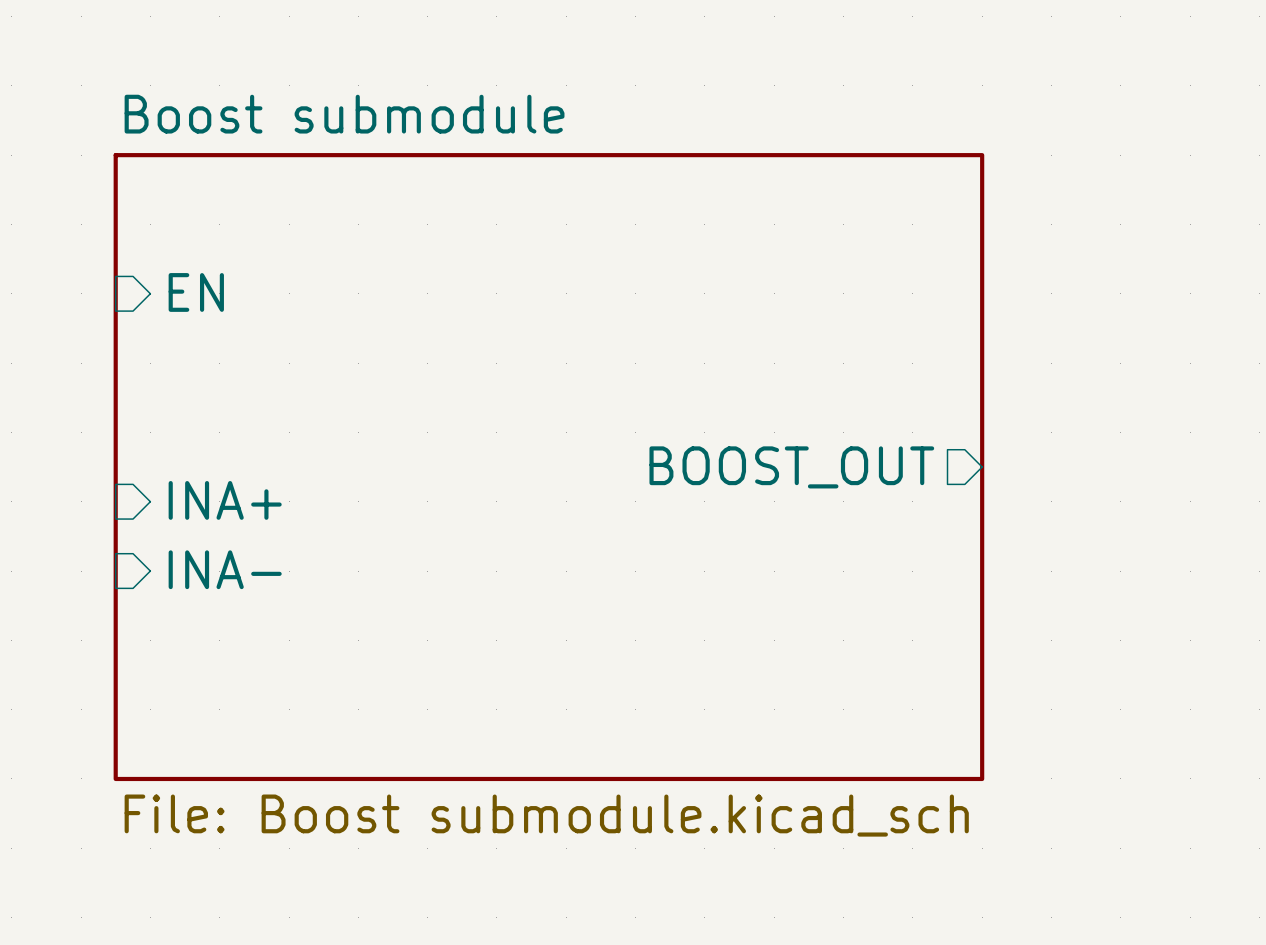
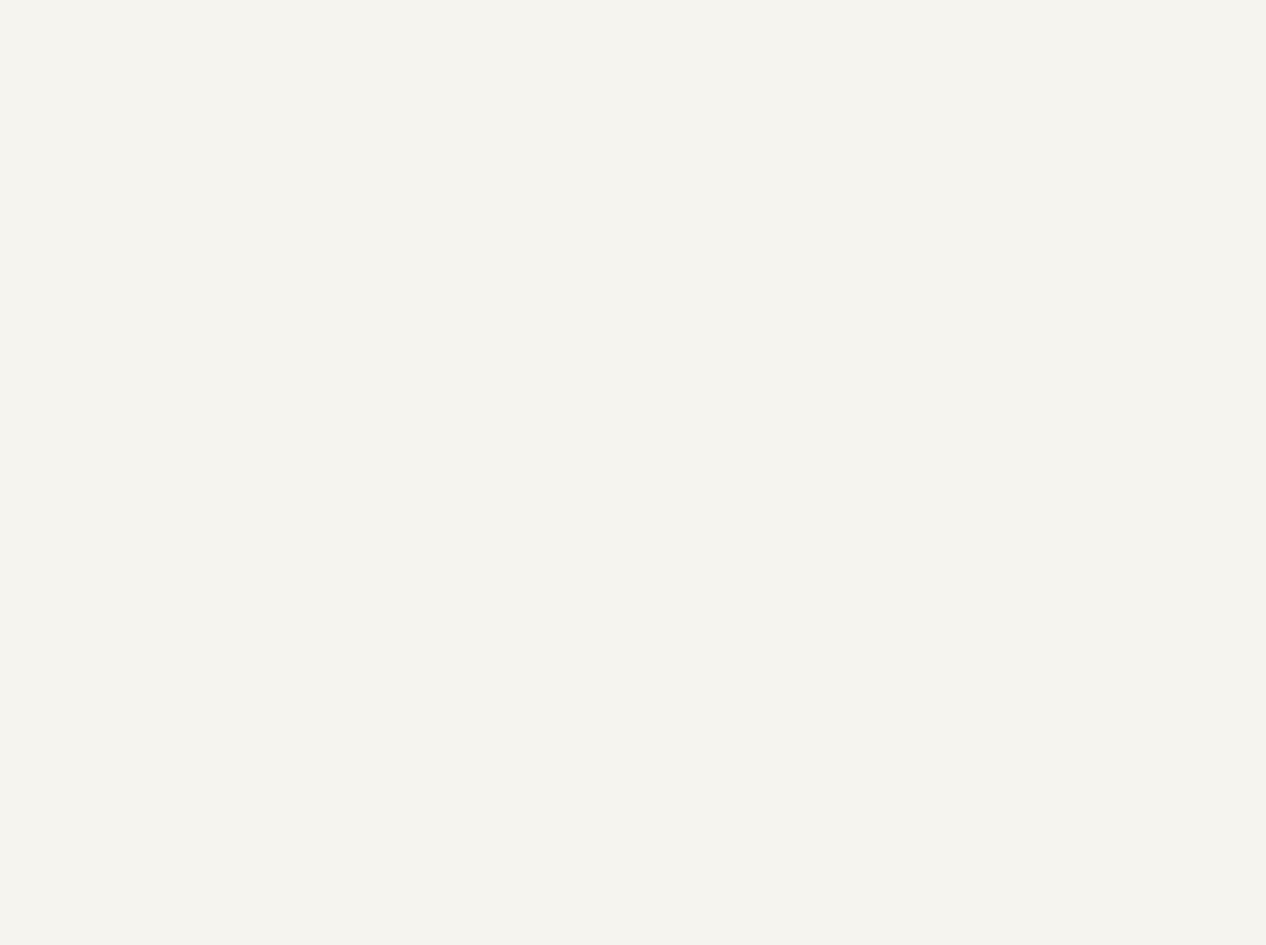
sheet pin: EN (196, 292) -> none
sheet Boost submodule: File: Boost submodule.kicad_sch (548, 467) -> none
sheet pin: BOOST_OUT (791, 467) -> none
sheet pin: INA+ (225, 500) -> none
sheet pin: INA- (225, 569) -> none

